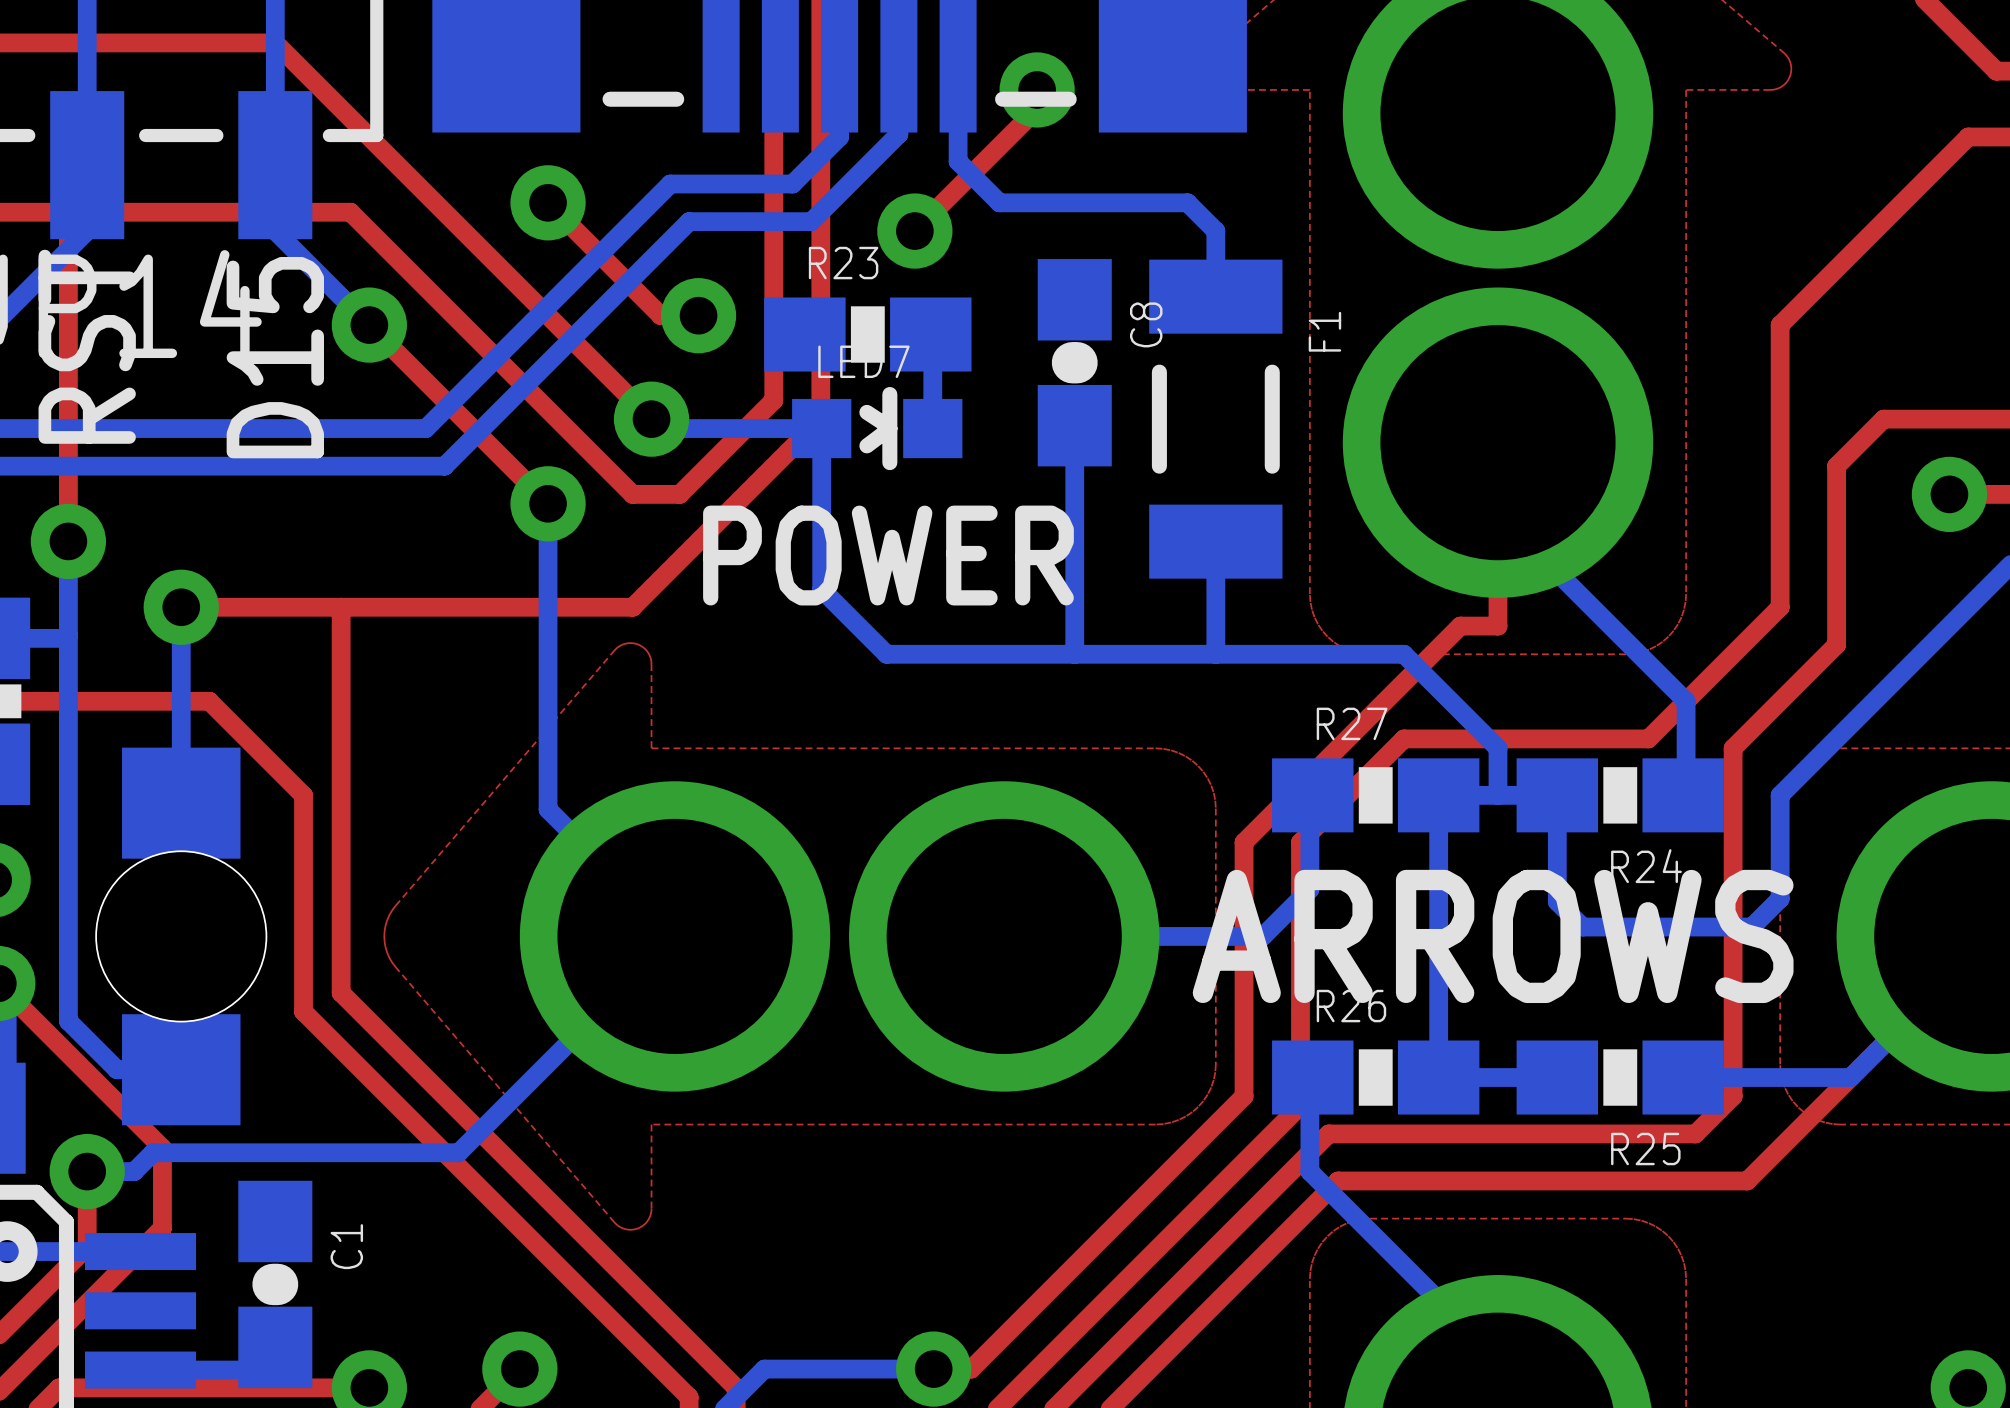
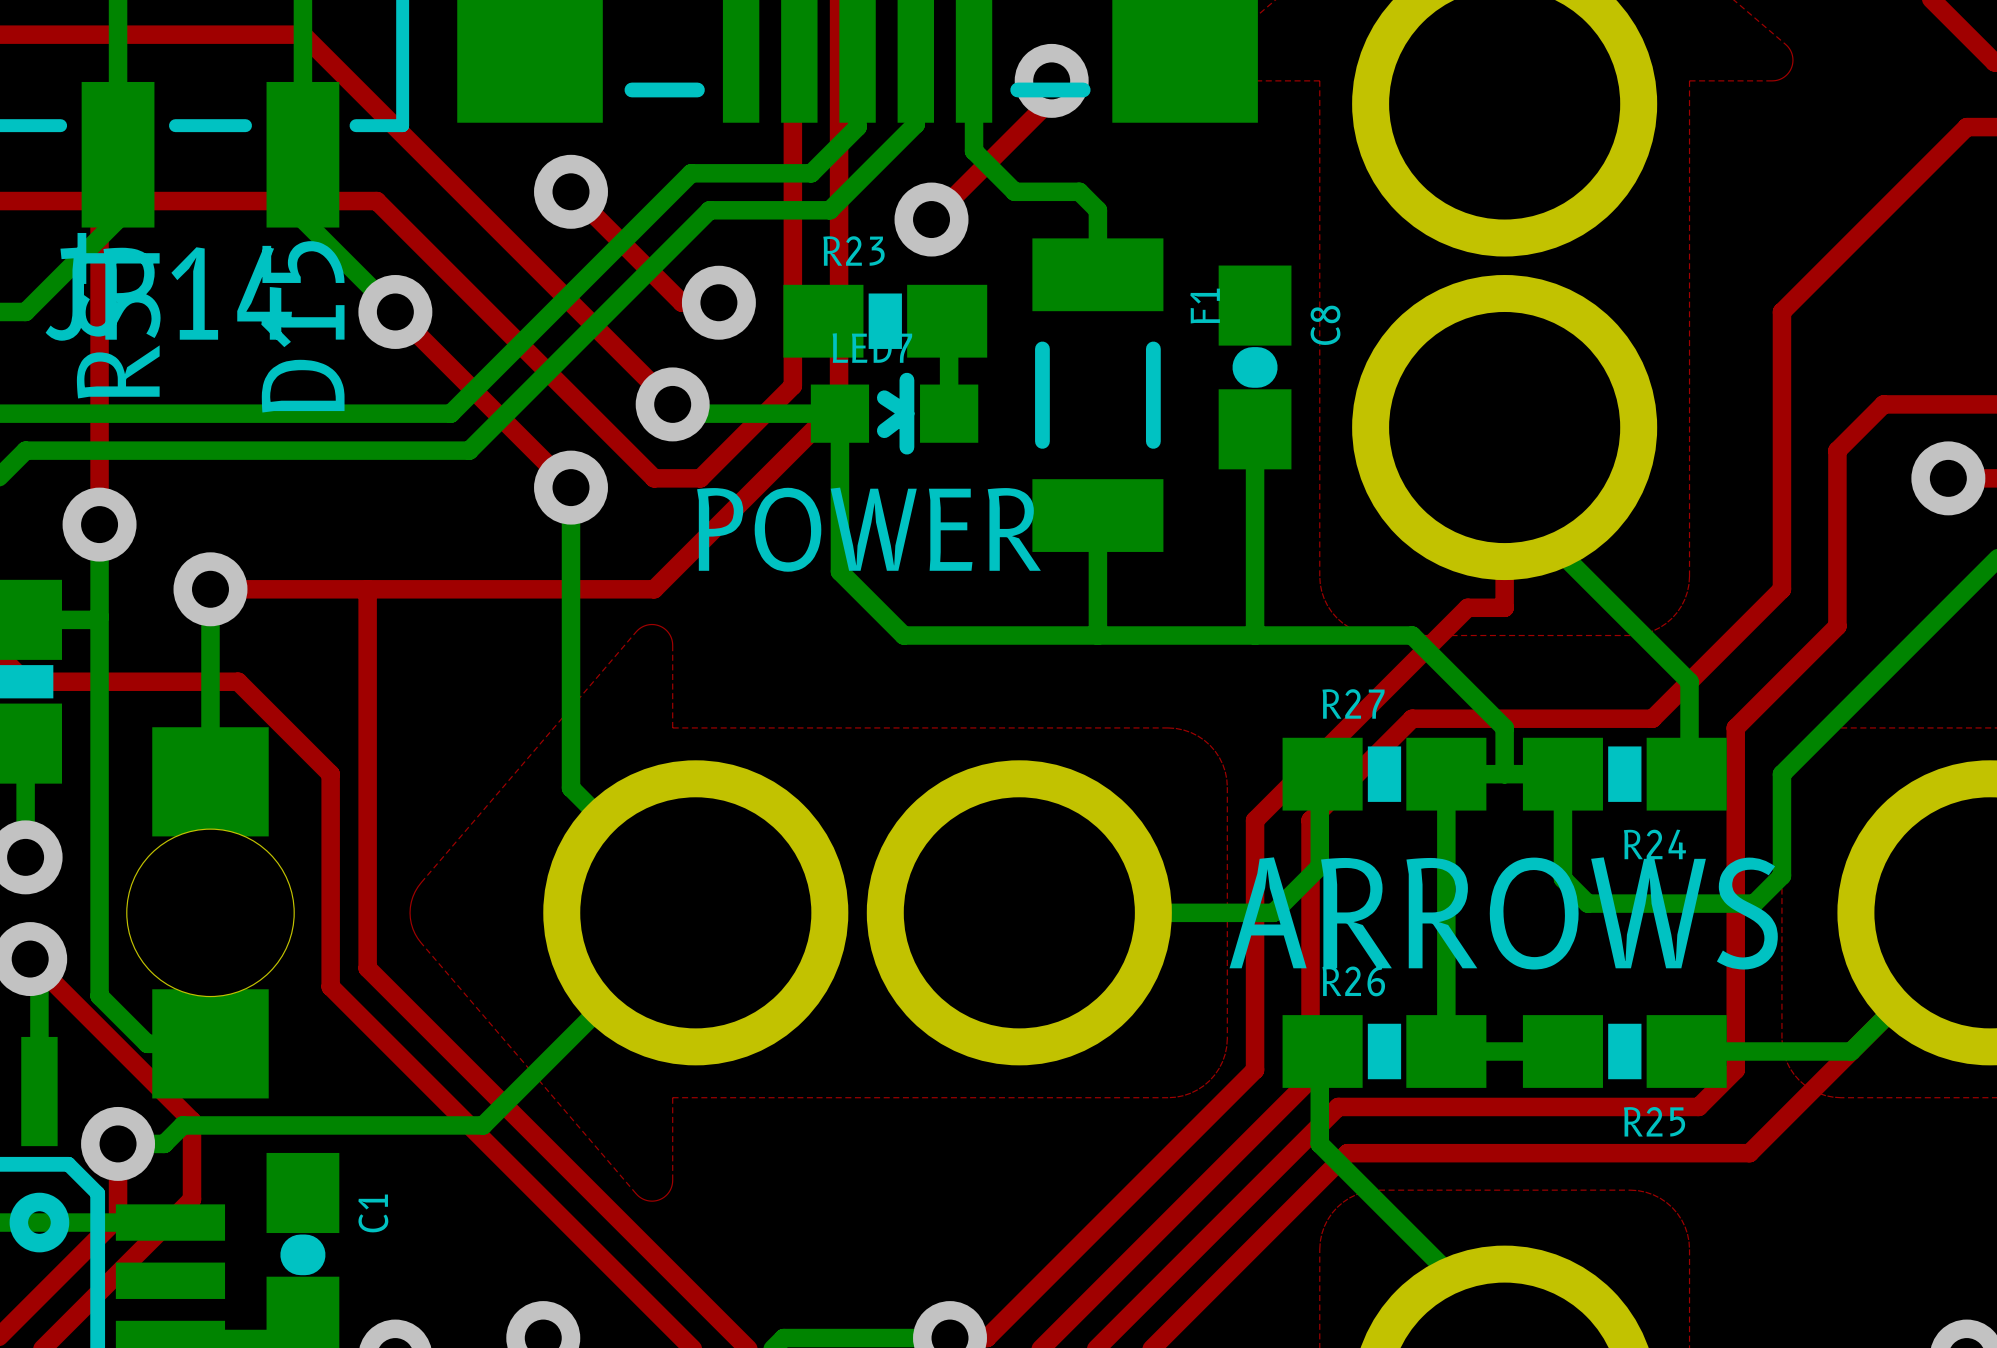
bottom track: (1065, 202) (1187, 202) (1215, 231) (1215, 296) -> (1079, 191) (1097, 210) (1097, 274)
C8 position: (1074, 362) -> (1255, 367)
F1 position: (1215, 419) -> (1097, 395)
bottom track: (1074, 425) (1074, 654) -> none
bottom track: none -> (1255, 429) (1255, 635)
bottom track: none -> (1097, 515) (1097, 635)
bottom track: (1215, 541) (1215, 654) -> none
text position: POWER (888, 555) -> POWER (868, 529)

